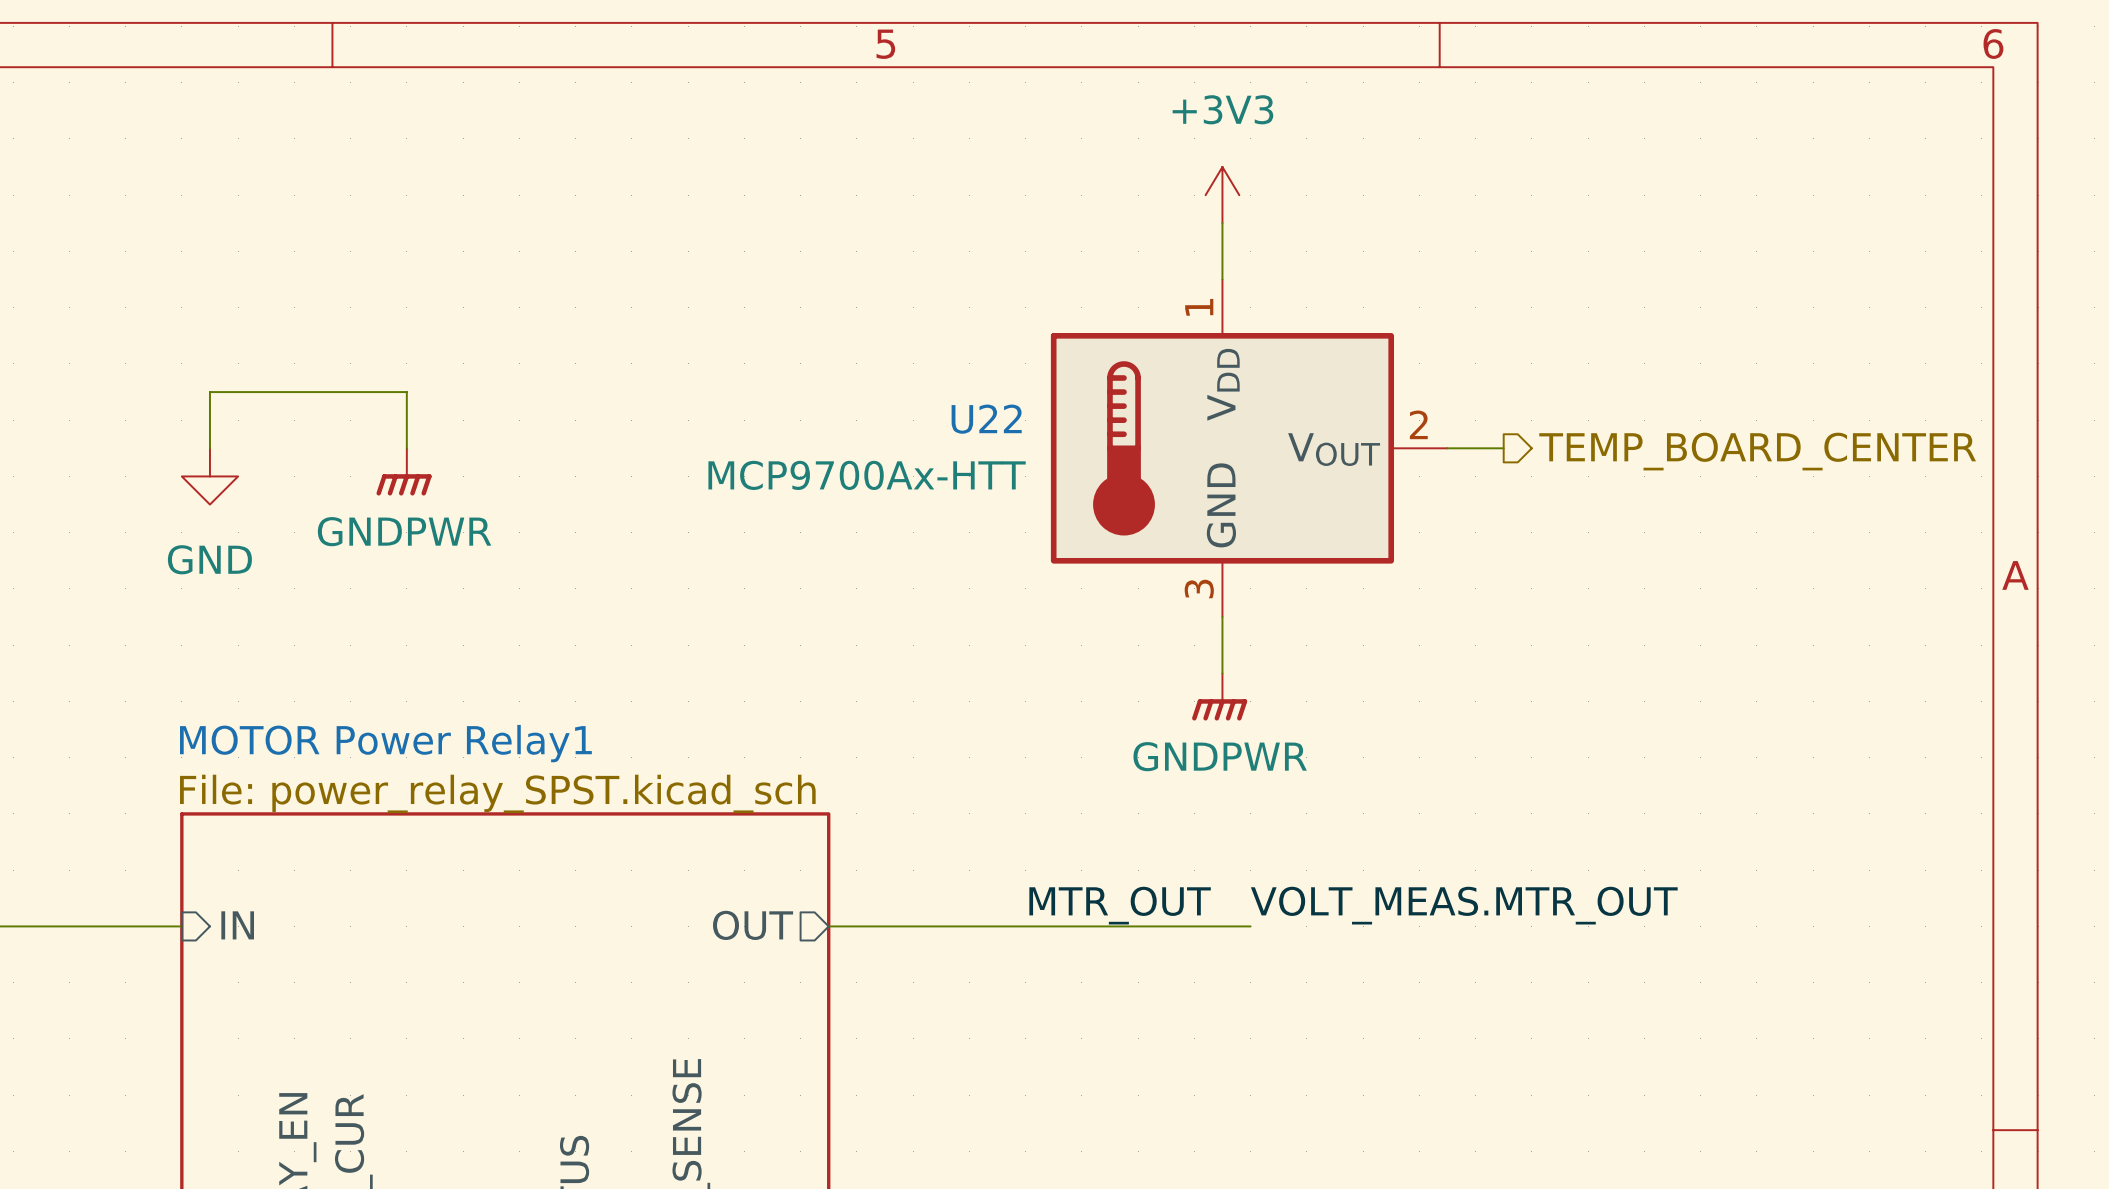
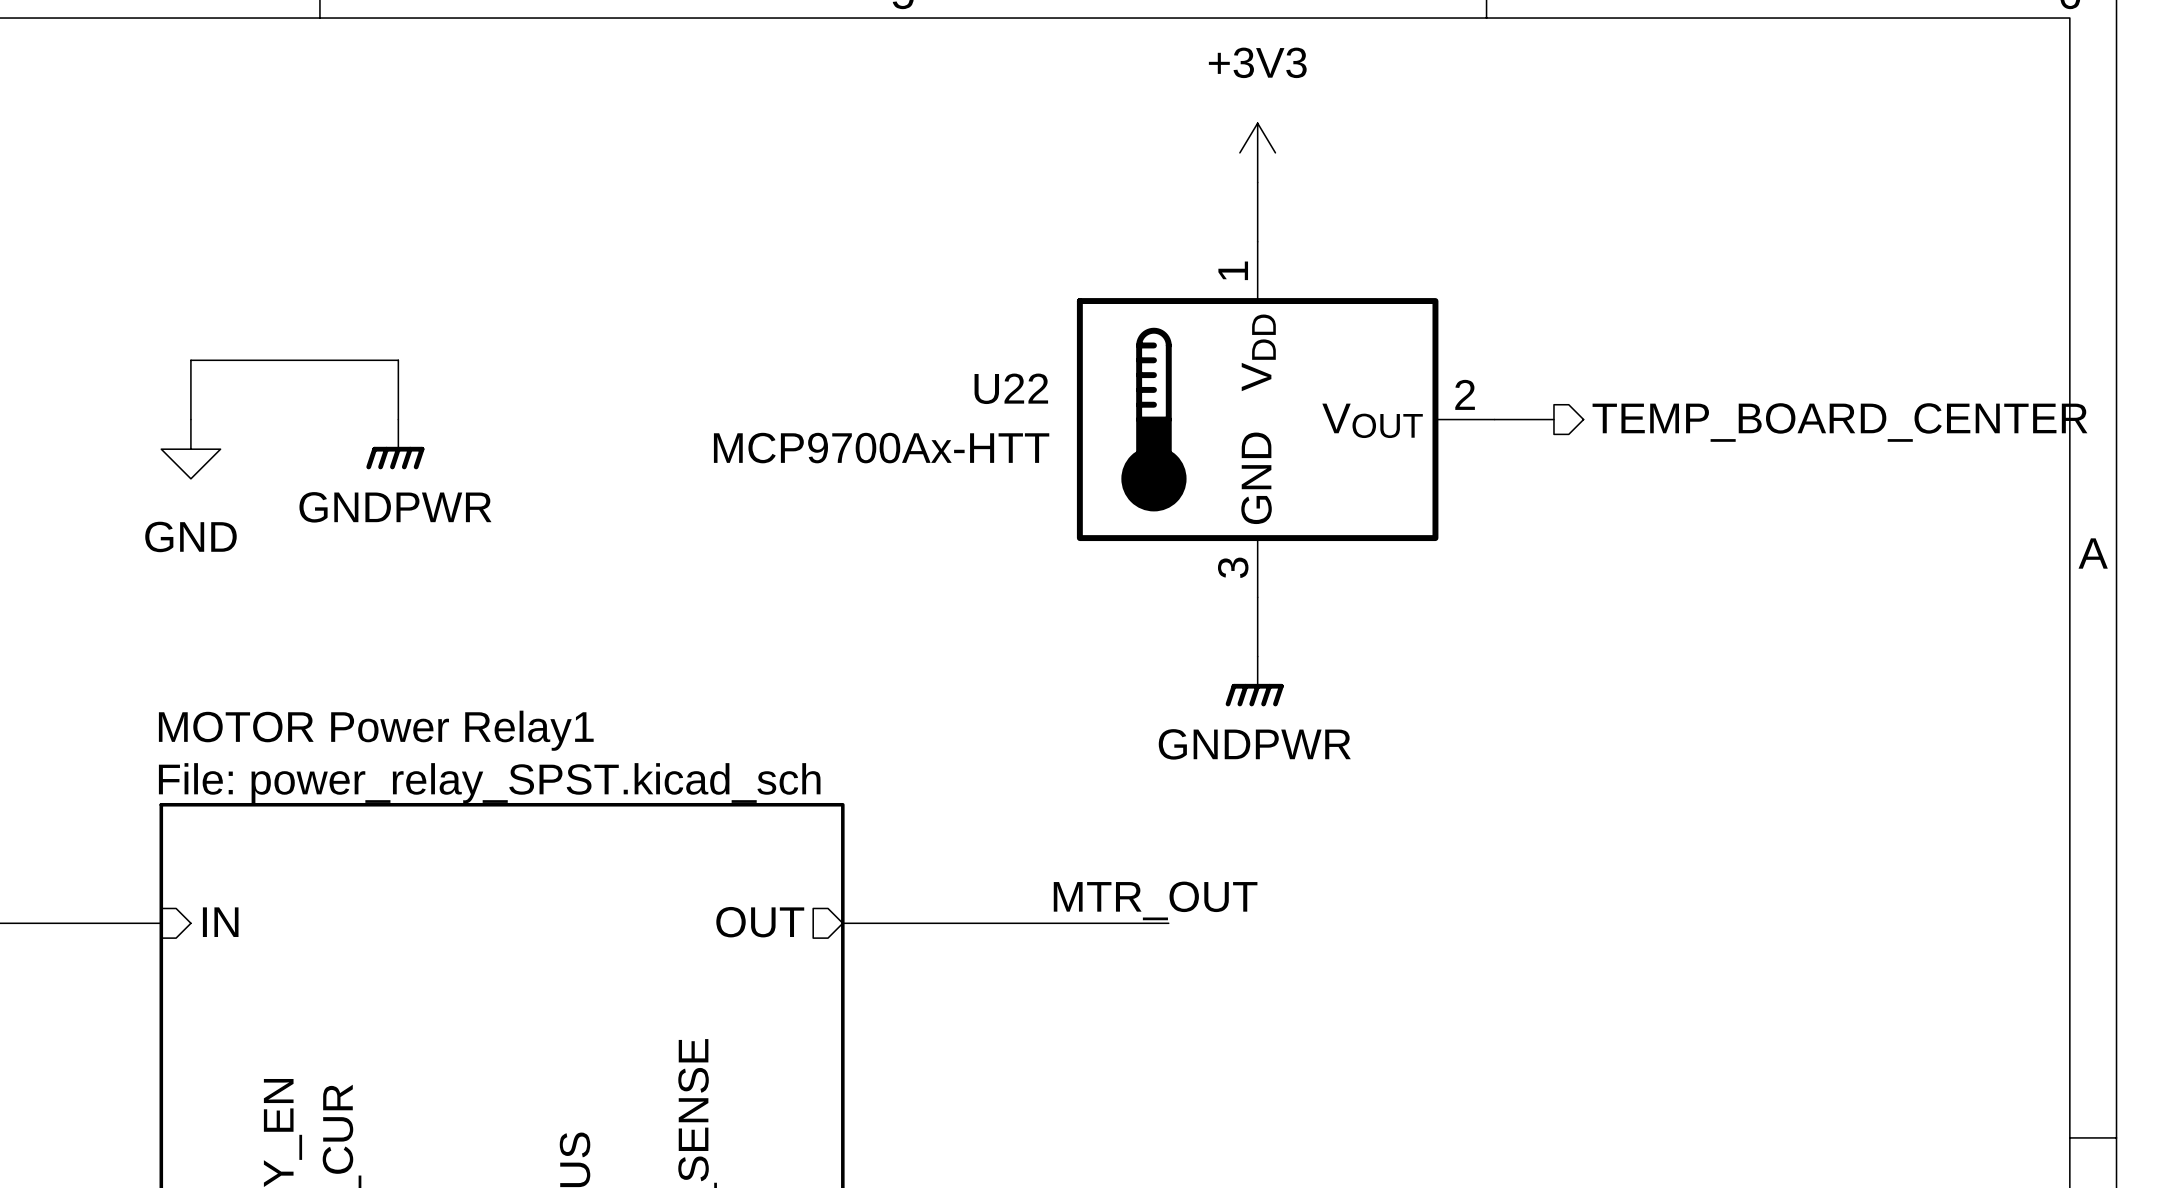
label: VOLT_MEAS.MTR_OUT (1464, 905) -> none
wire: (1138, 926) (1250, 926) -> none

